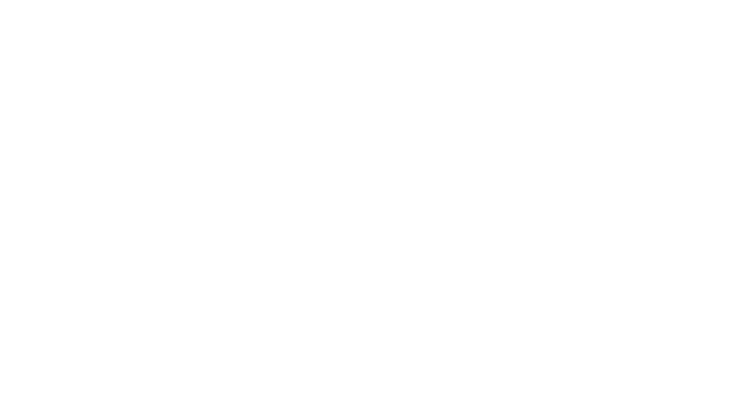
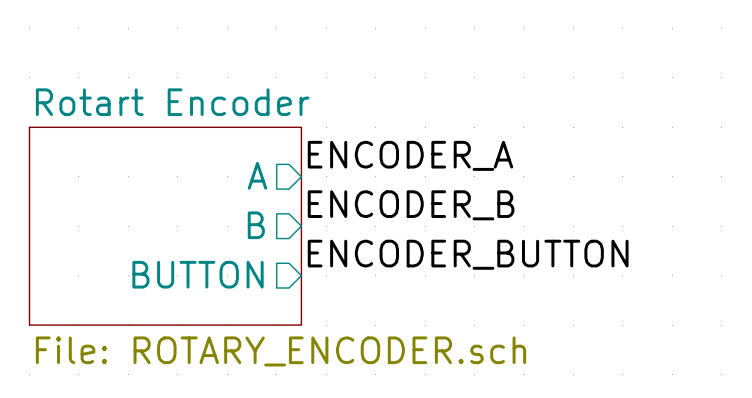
label: none -> ENCODER_A (410, 155)
sheet pin: none -> A (257, 175)
label: none -> ENCODER_B (411, 205)
sheet pin: none -> B (256, 225)
sheet Rotart Encoder: none -> File: ROTARY_ENCODER.sch (165, 226)
label: none -> ENCODER_BUTTON (468, 254)
sheet pin: none -> BUTTON (198, 274)

